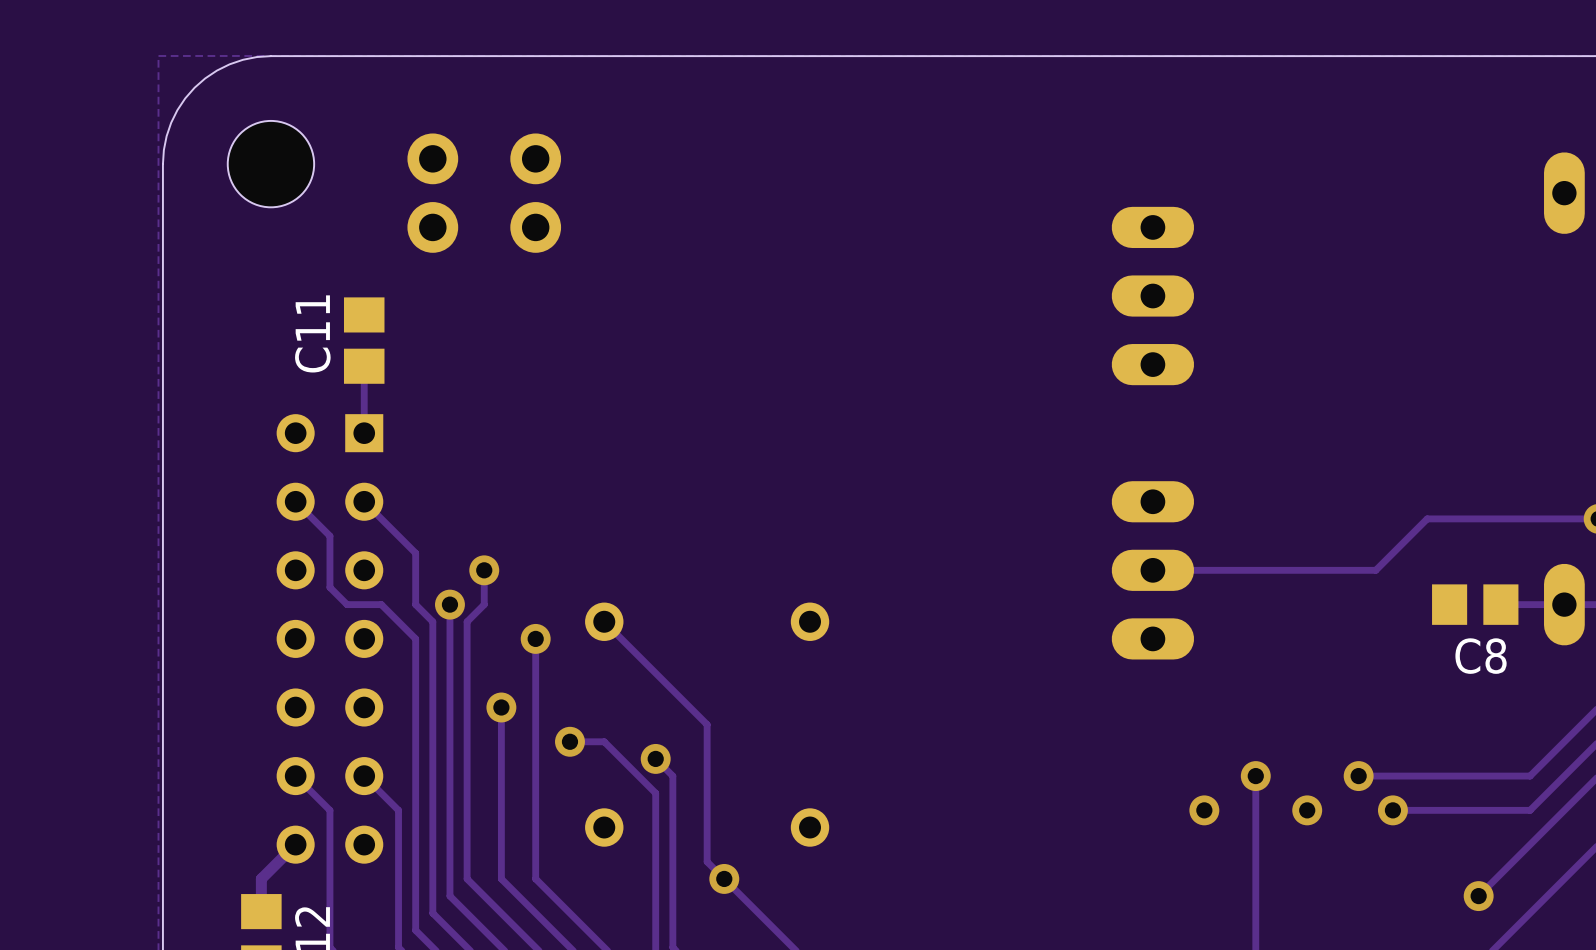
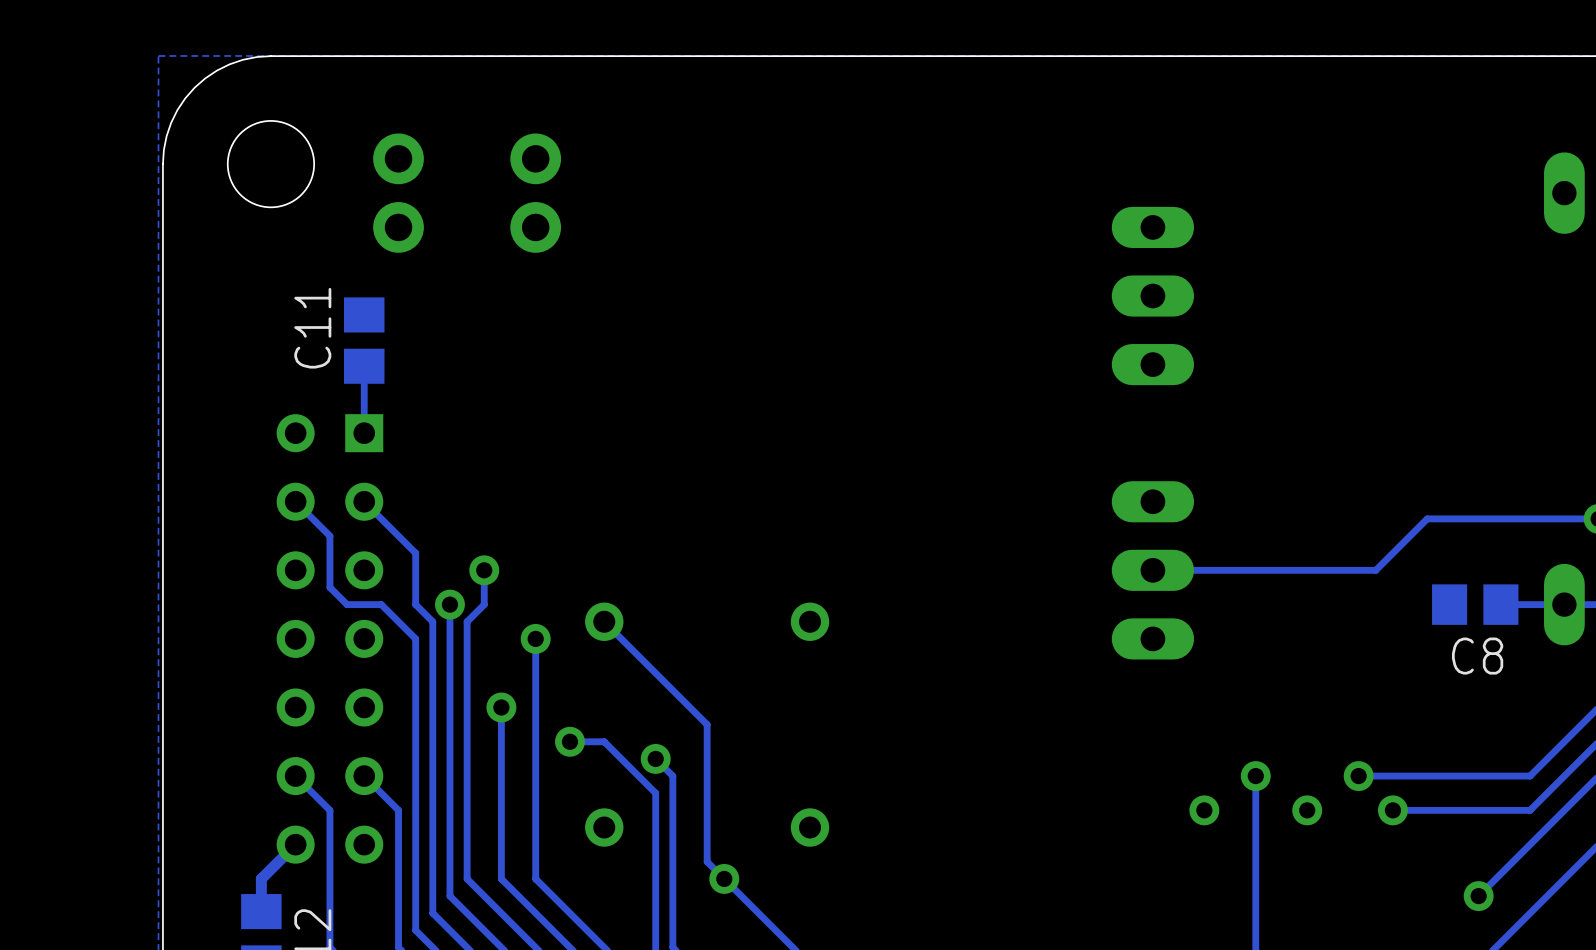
part position: (432, 193) -> (398, 193)

